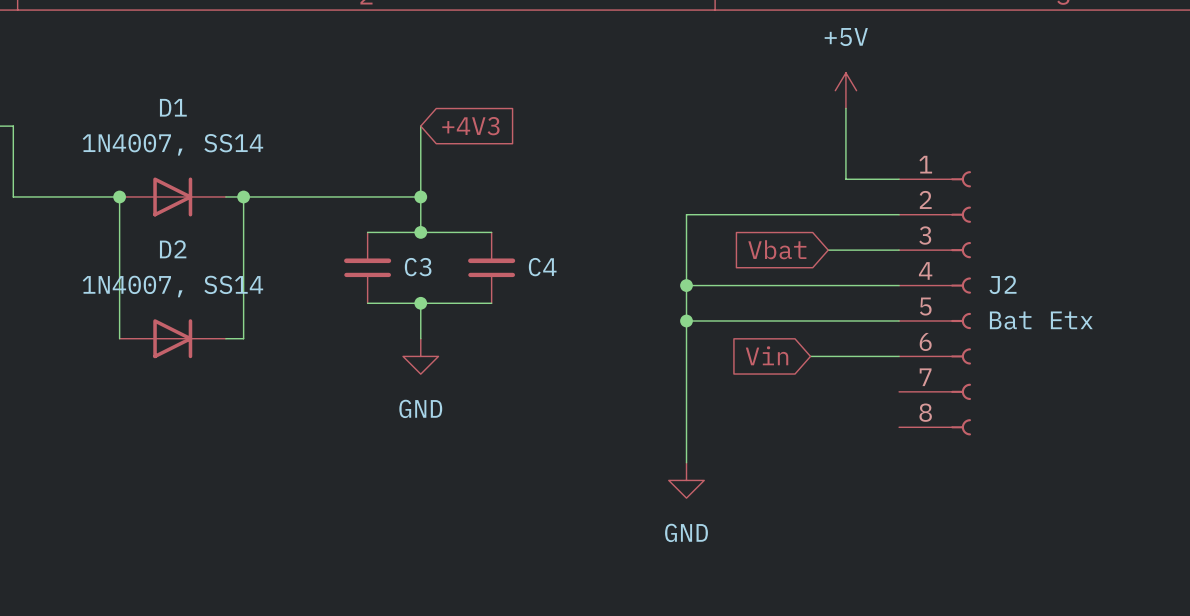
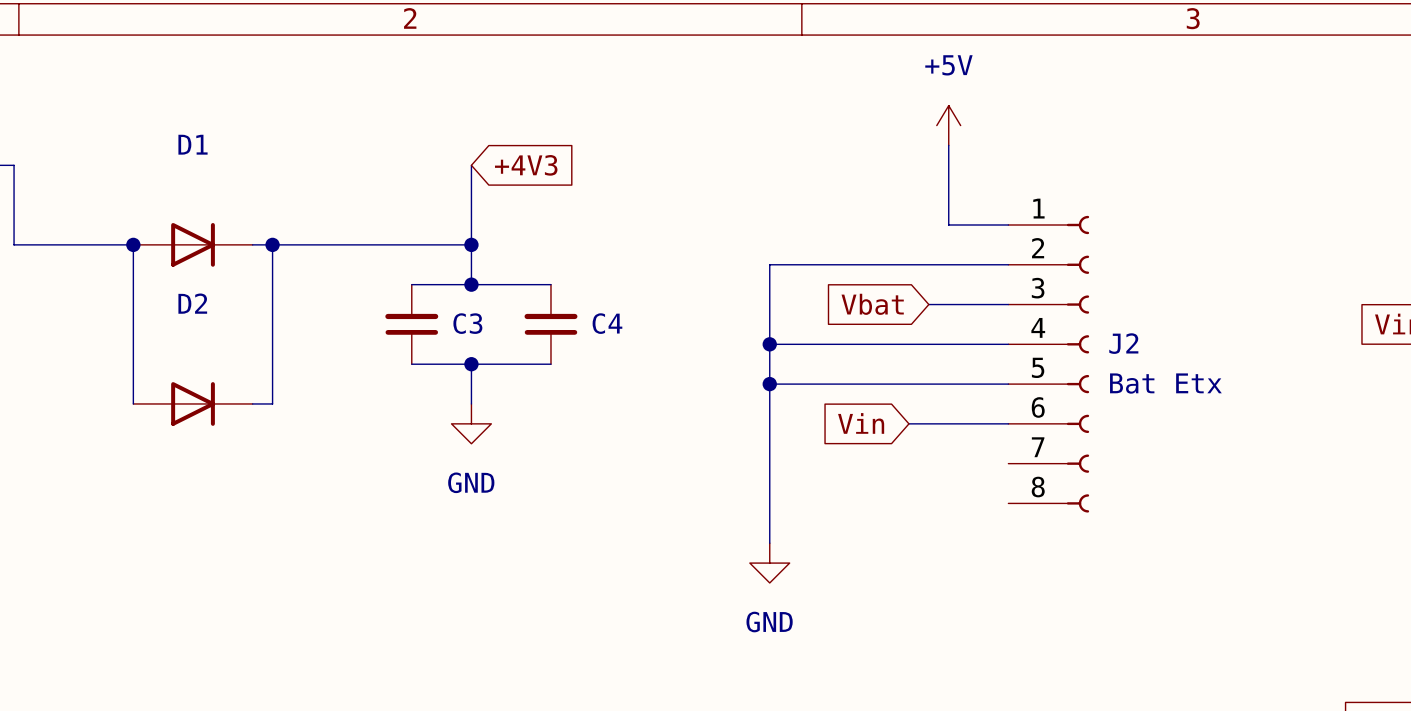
D1 value: 1N4007, SS14 (172, 144) -> none
D2 value: 1N4007, SS14 (172, 286) -> none

